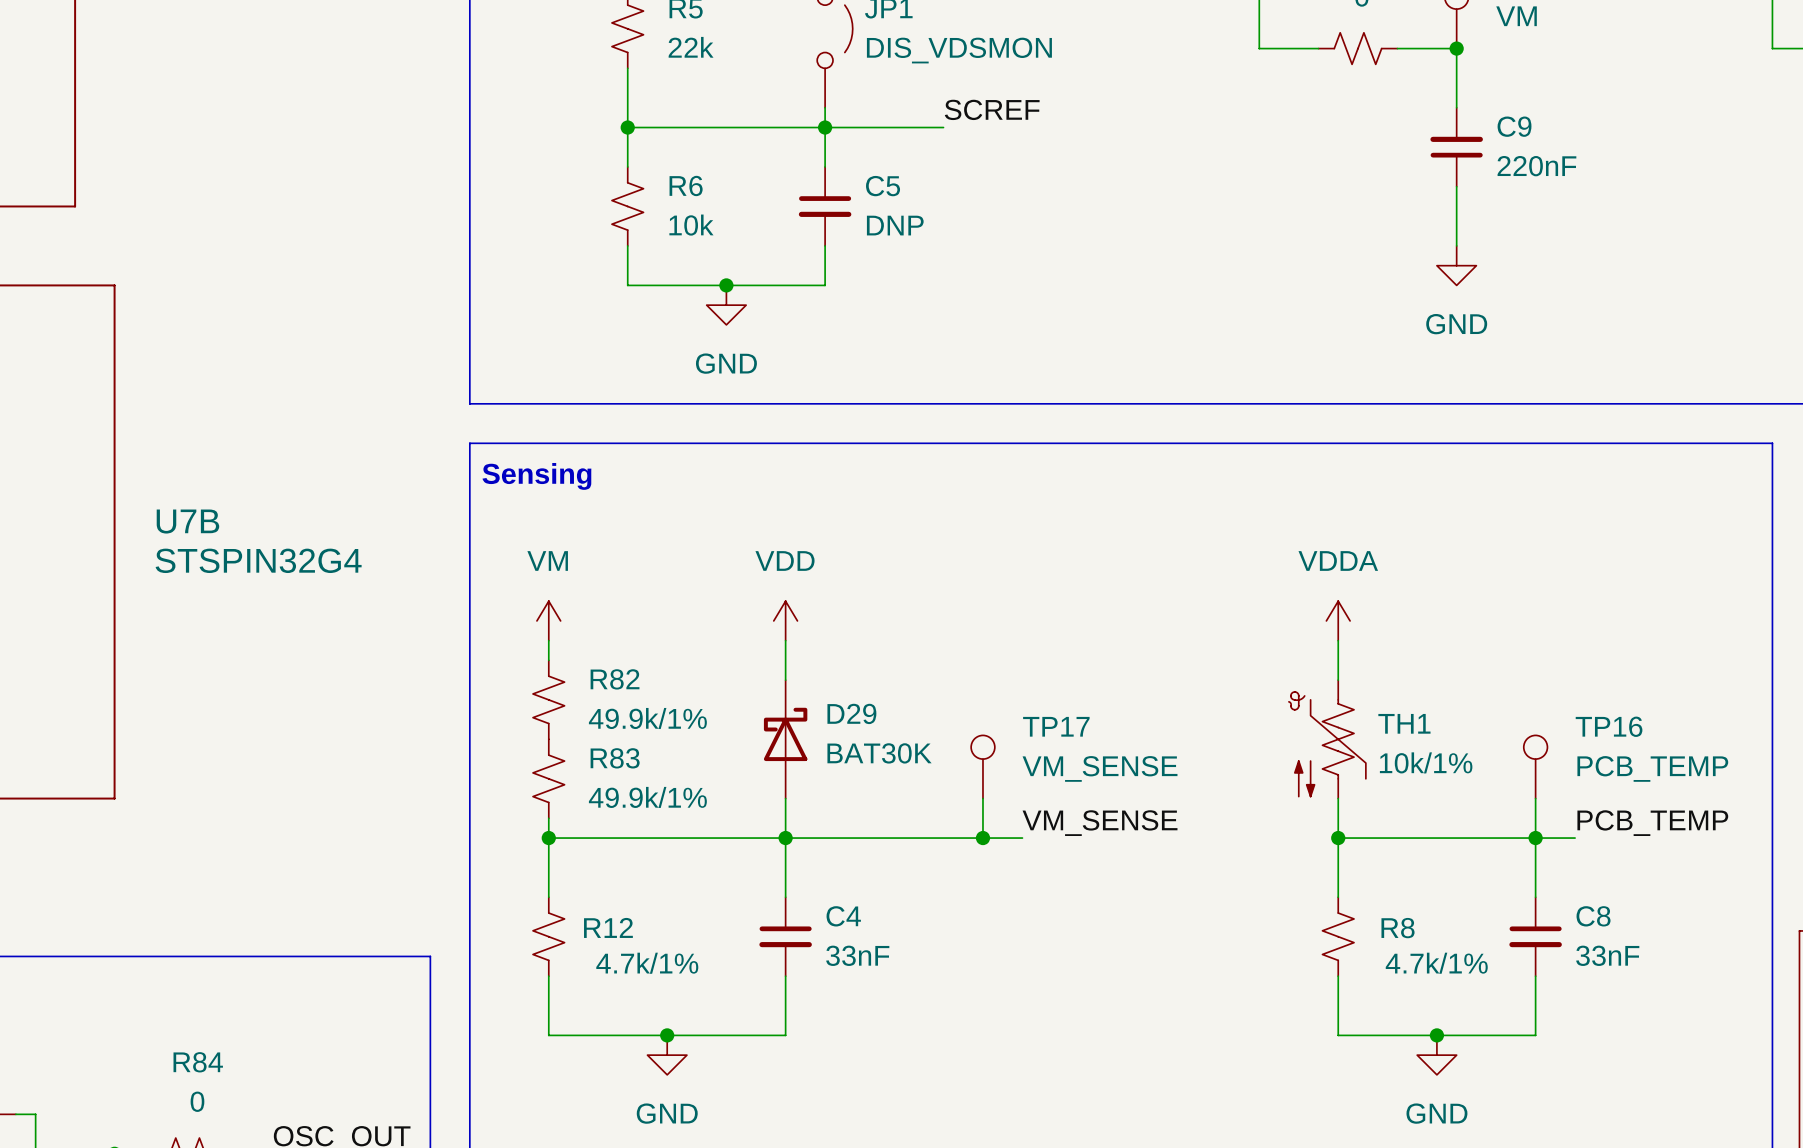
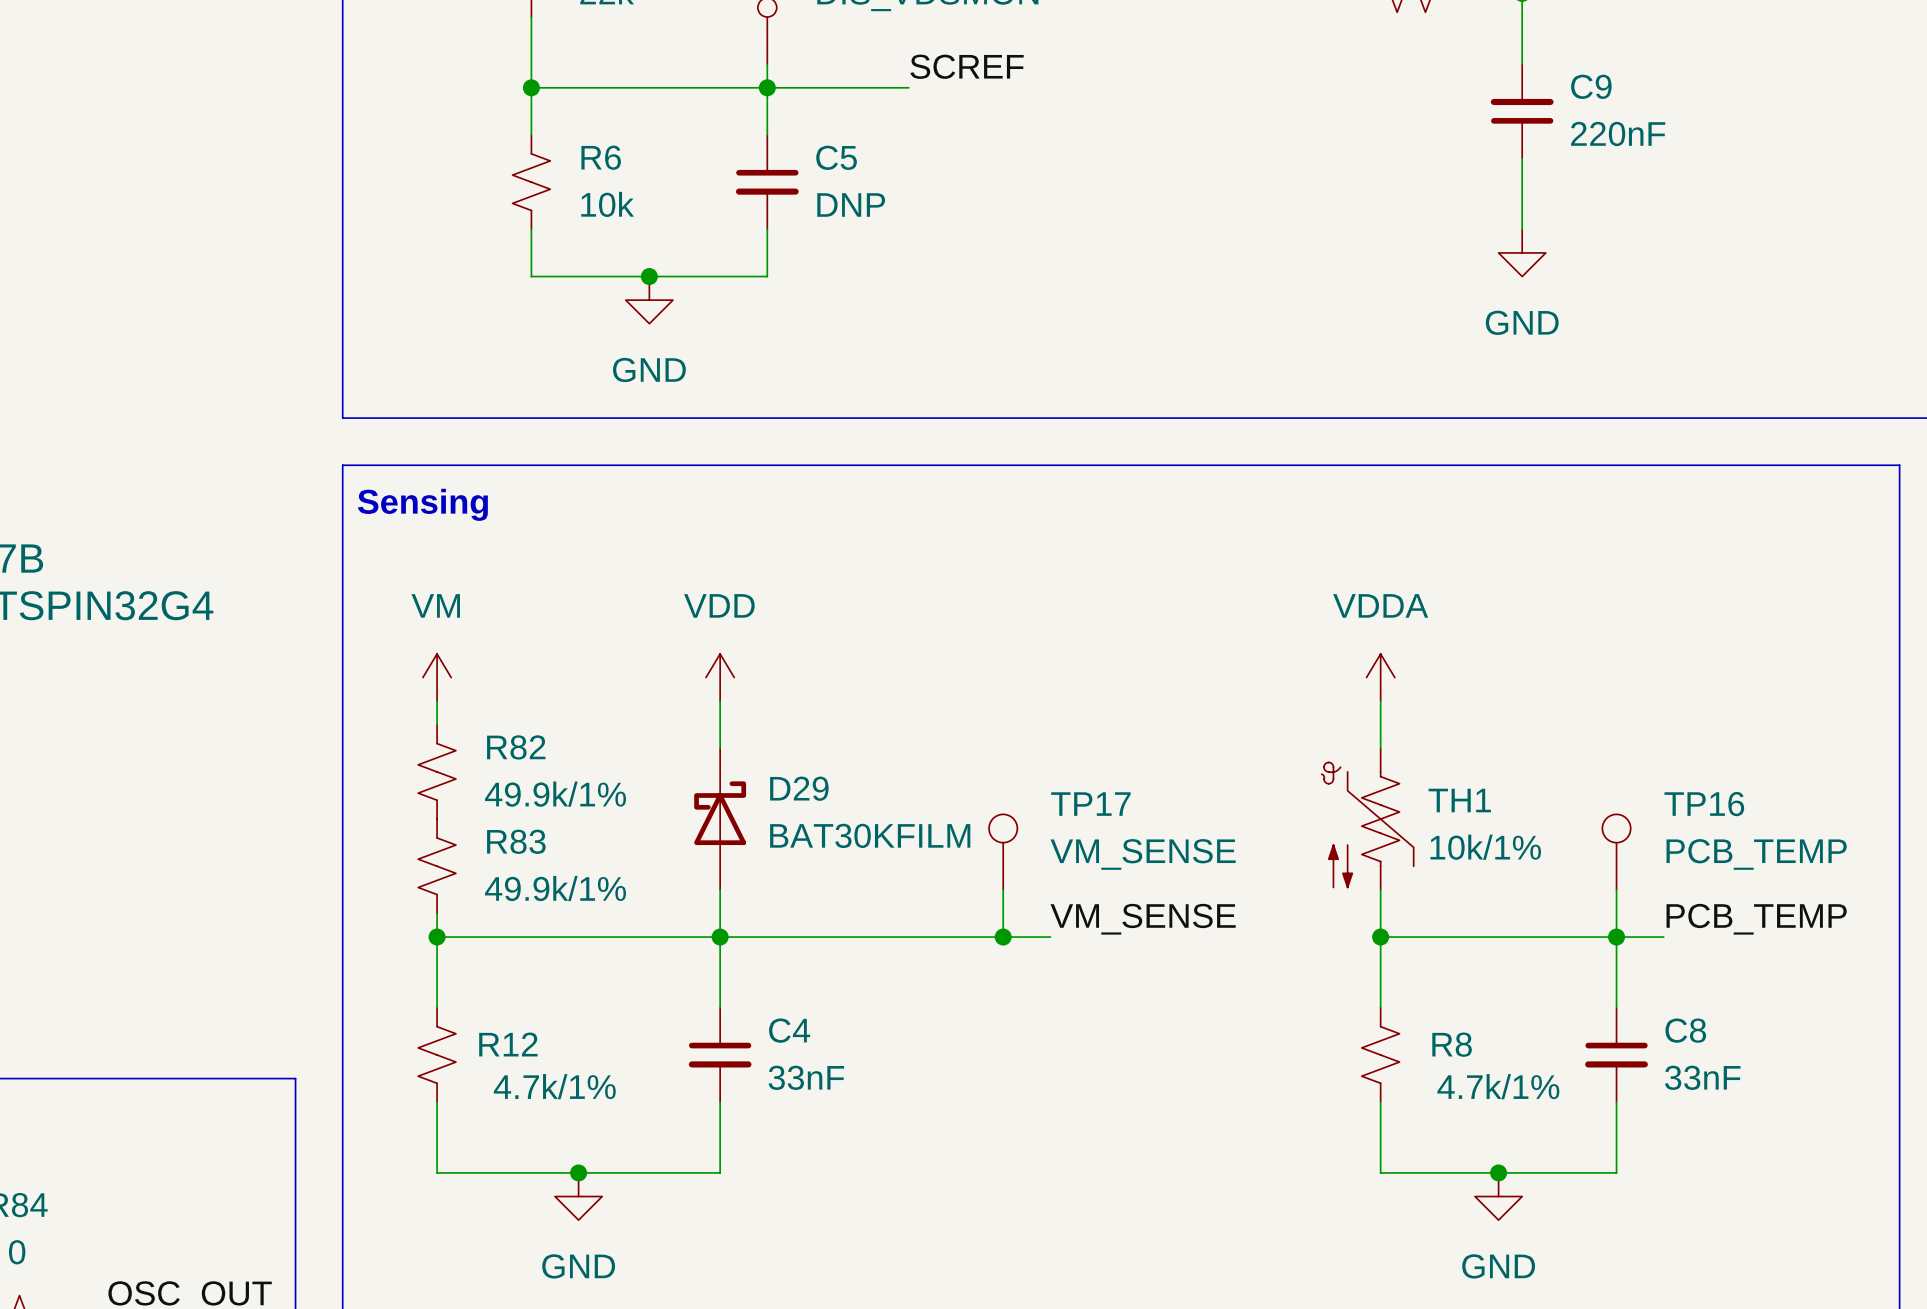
D29 value: BAT30K (879, 753) -> BAT30KFILM (870, 835)
TP17 position: (982, 766) -> (1003, 852)
wire: (982, 798) (982, 838) -> none
wire: none -> (1003, 889) (1003, 937) (1050, 937)
label position: VM_SENSE (1100, 823) -> VM_SENSE (1143, 919)
junction position: (982, 838) -> (1003, 937)

